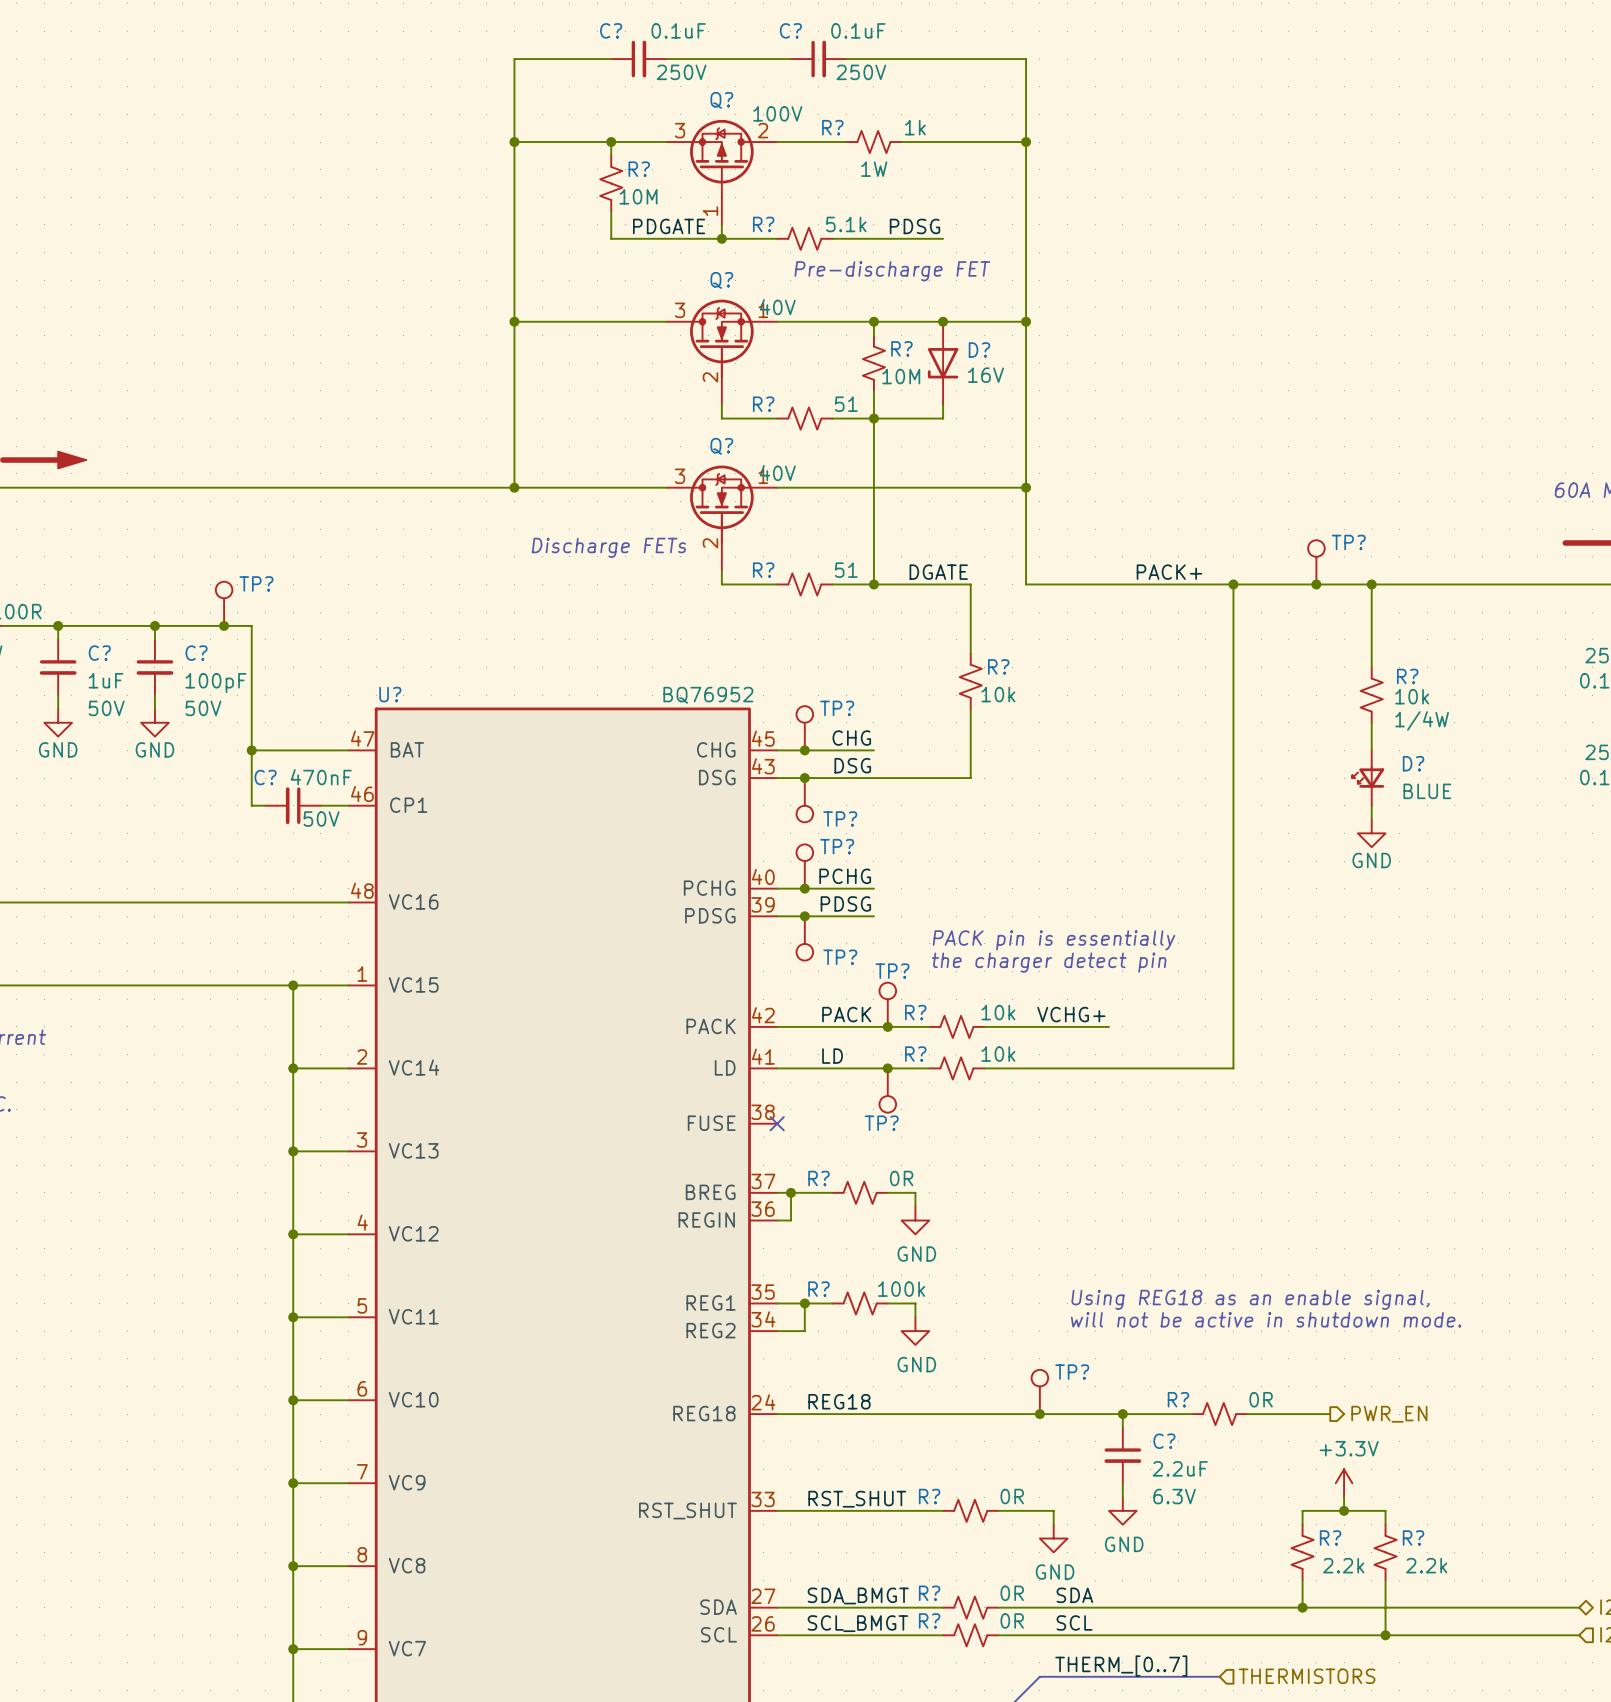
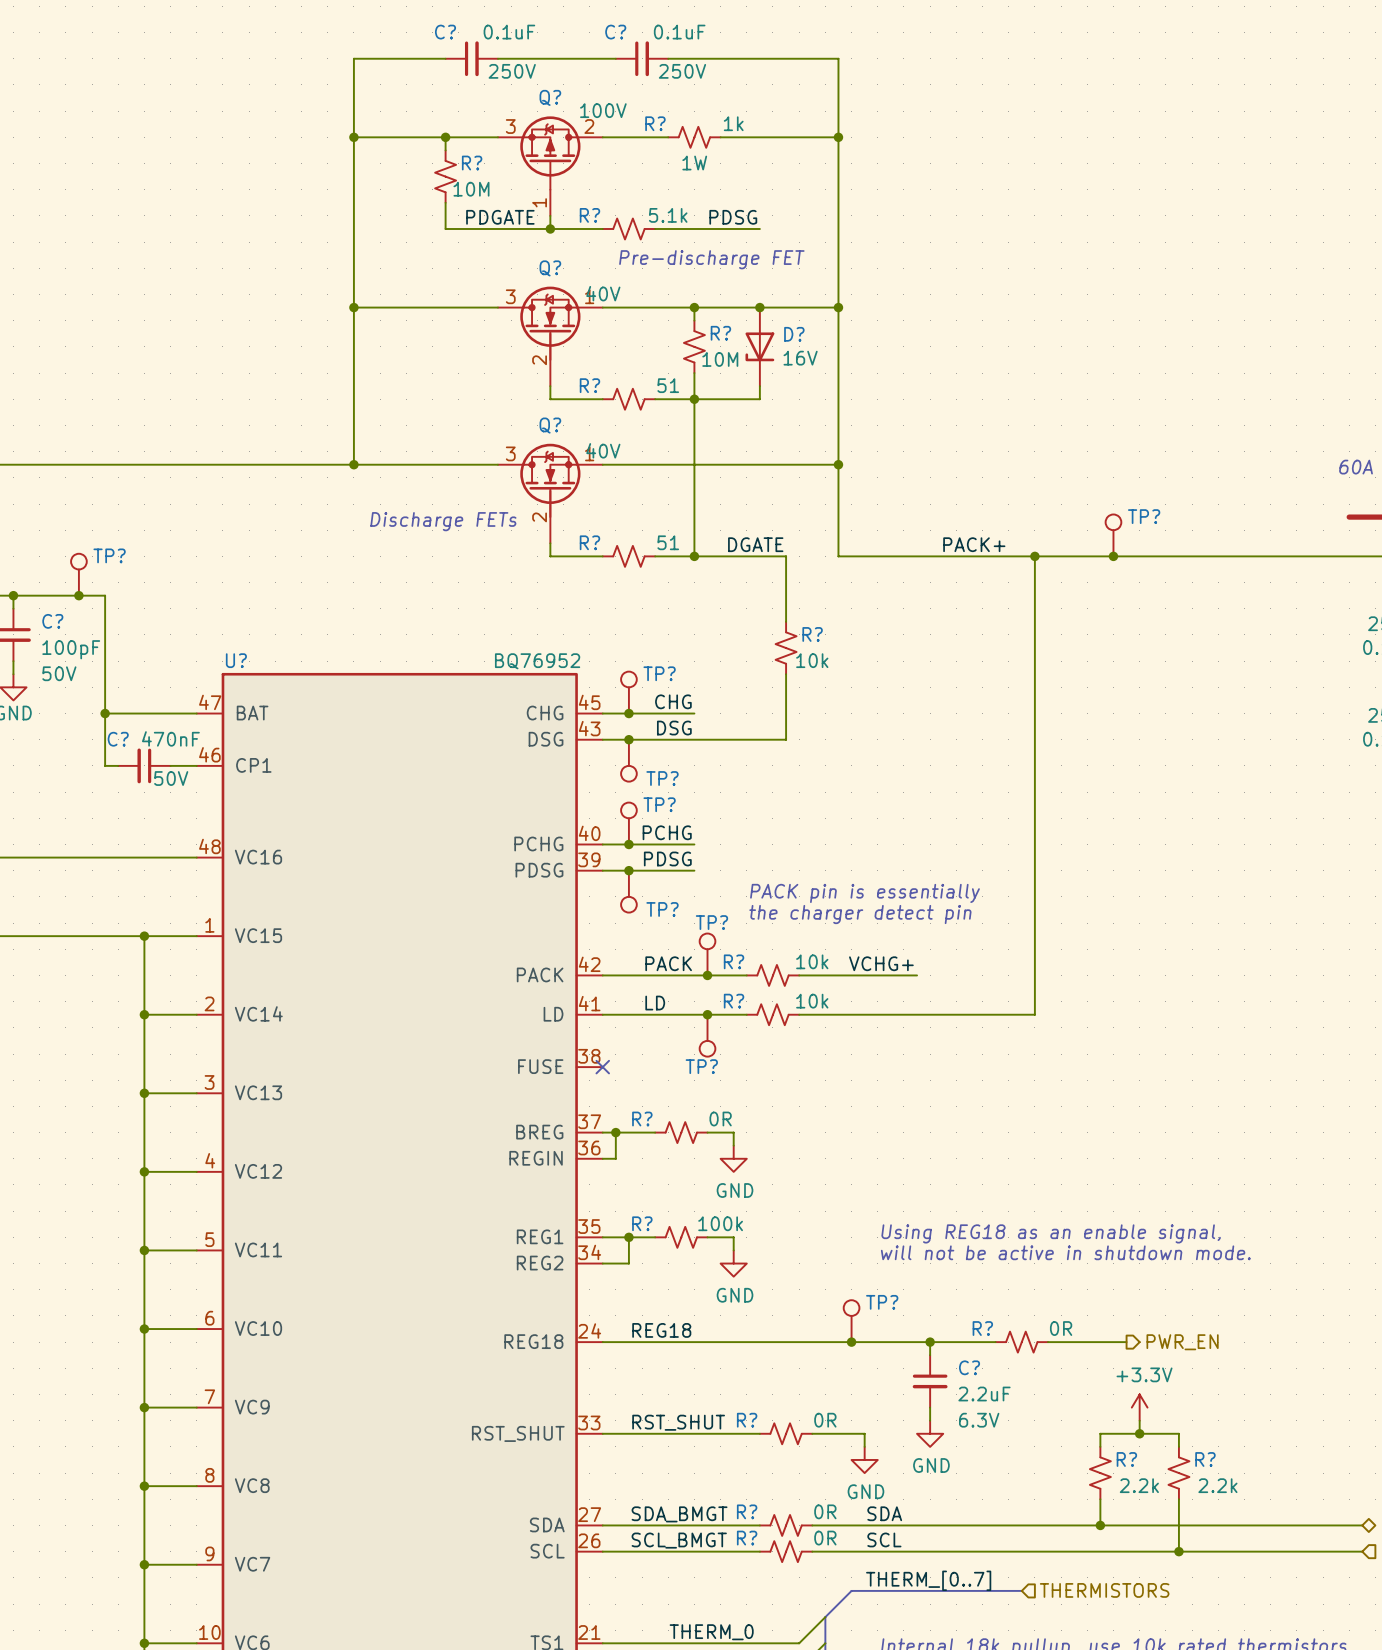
wire: (1371, 584) (1371, 667) -> none
junction: (1371, 584) -> none
R?: 10k (1371, 695) -> none
wire: (1371, 722) (1371, 750) -> none
D?: BLUE (1368, 778) -> none
wire: (1371, 805) (1371, 819) -> none
power symbol: GND (1371, 833) -> none

